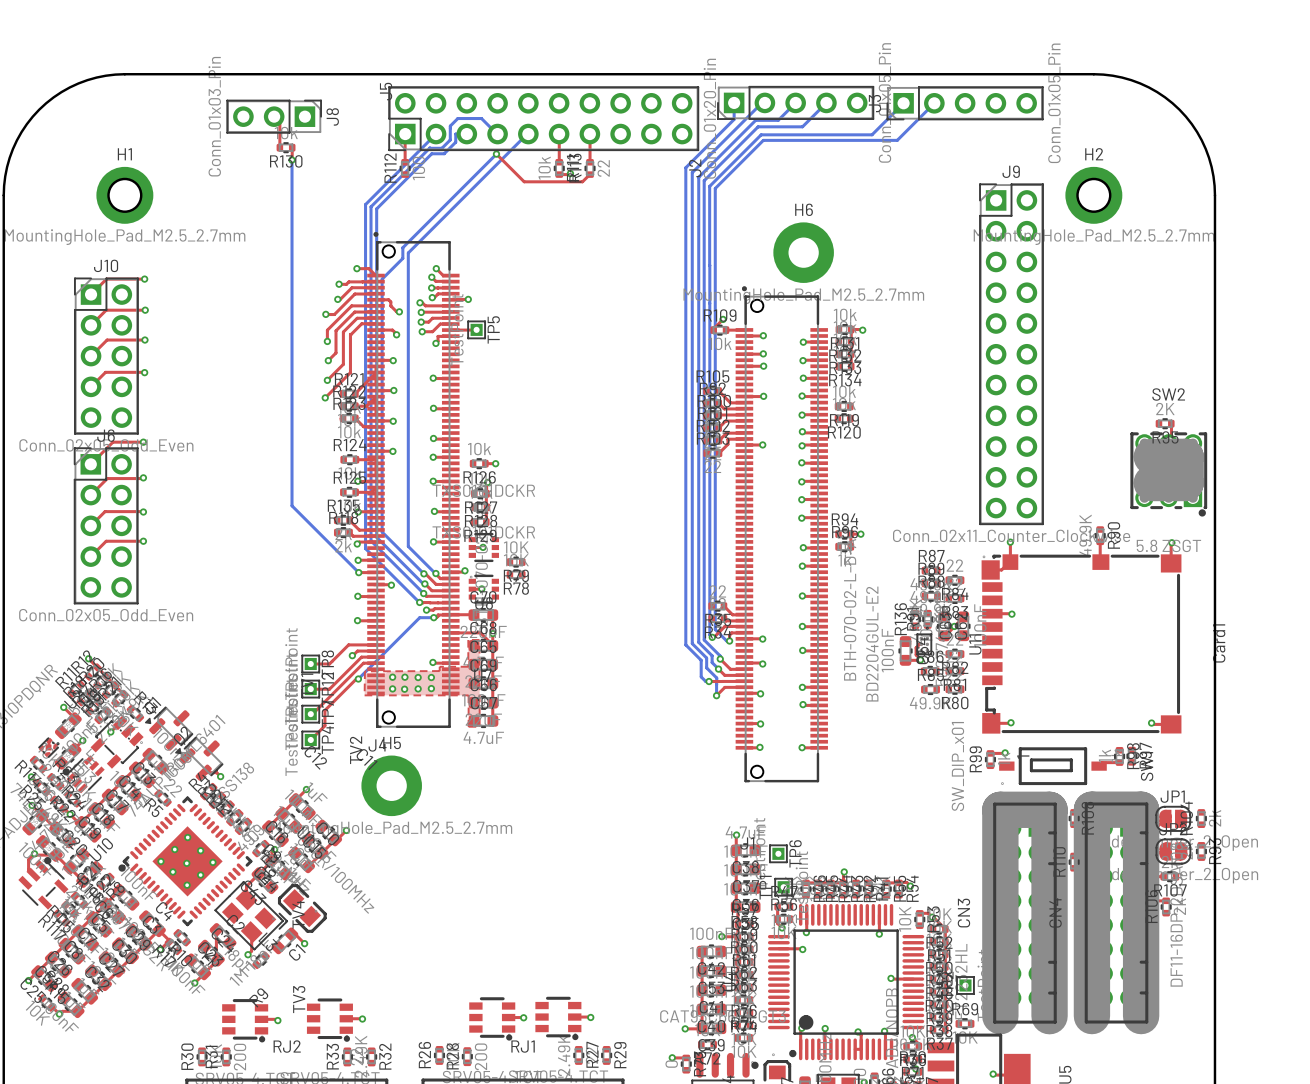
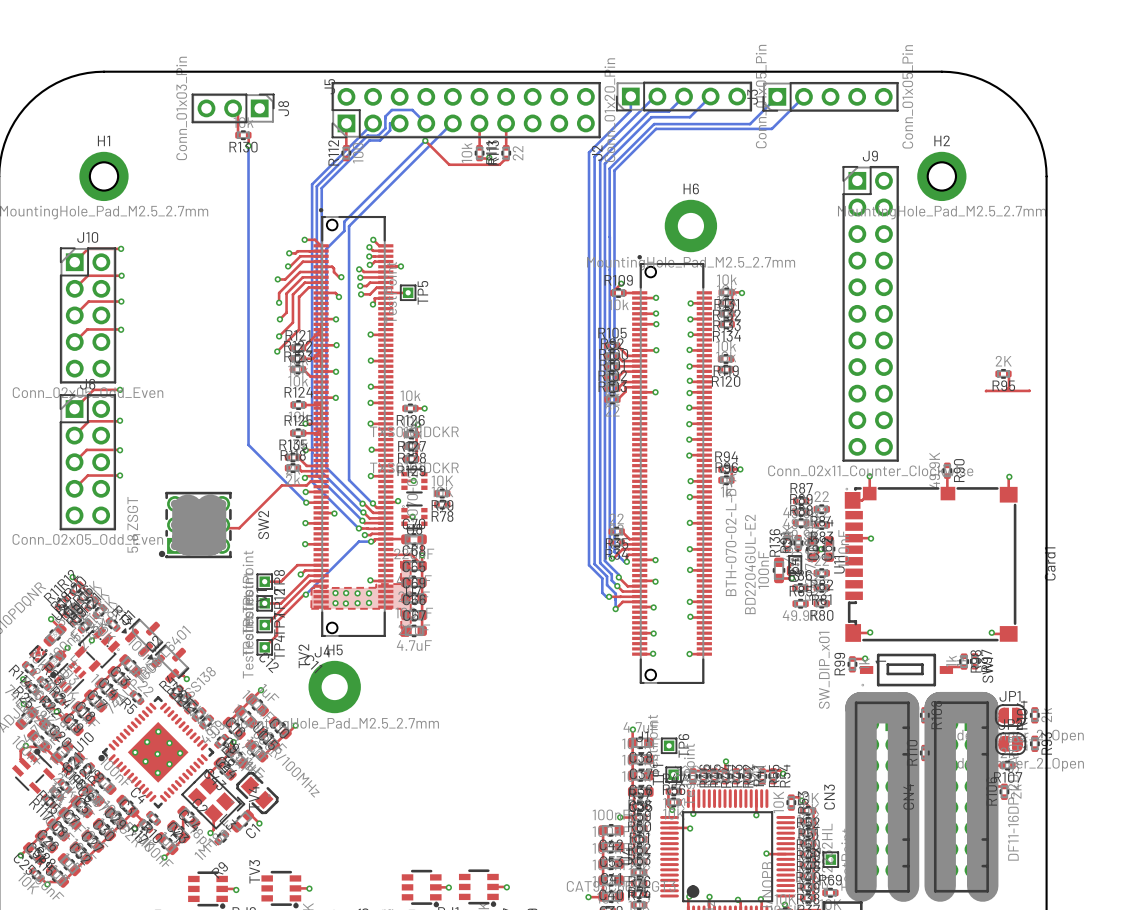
SW2 rotation: 0° (1168, 474) -> 90° clockwise (195, 525)
SW2 position: (1168, 474) -> (195, 525)
top track: none -> (321, 481) (310, 481) (306, 485) (281, 485) (239, 528) (224, 528)

